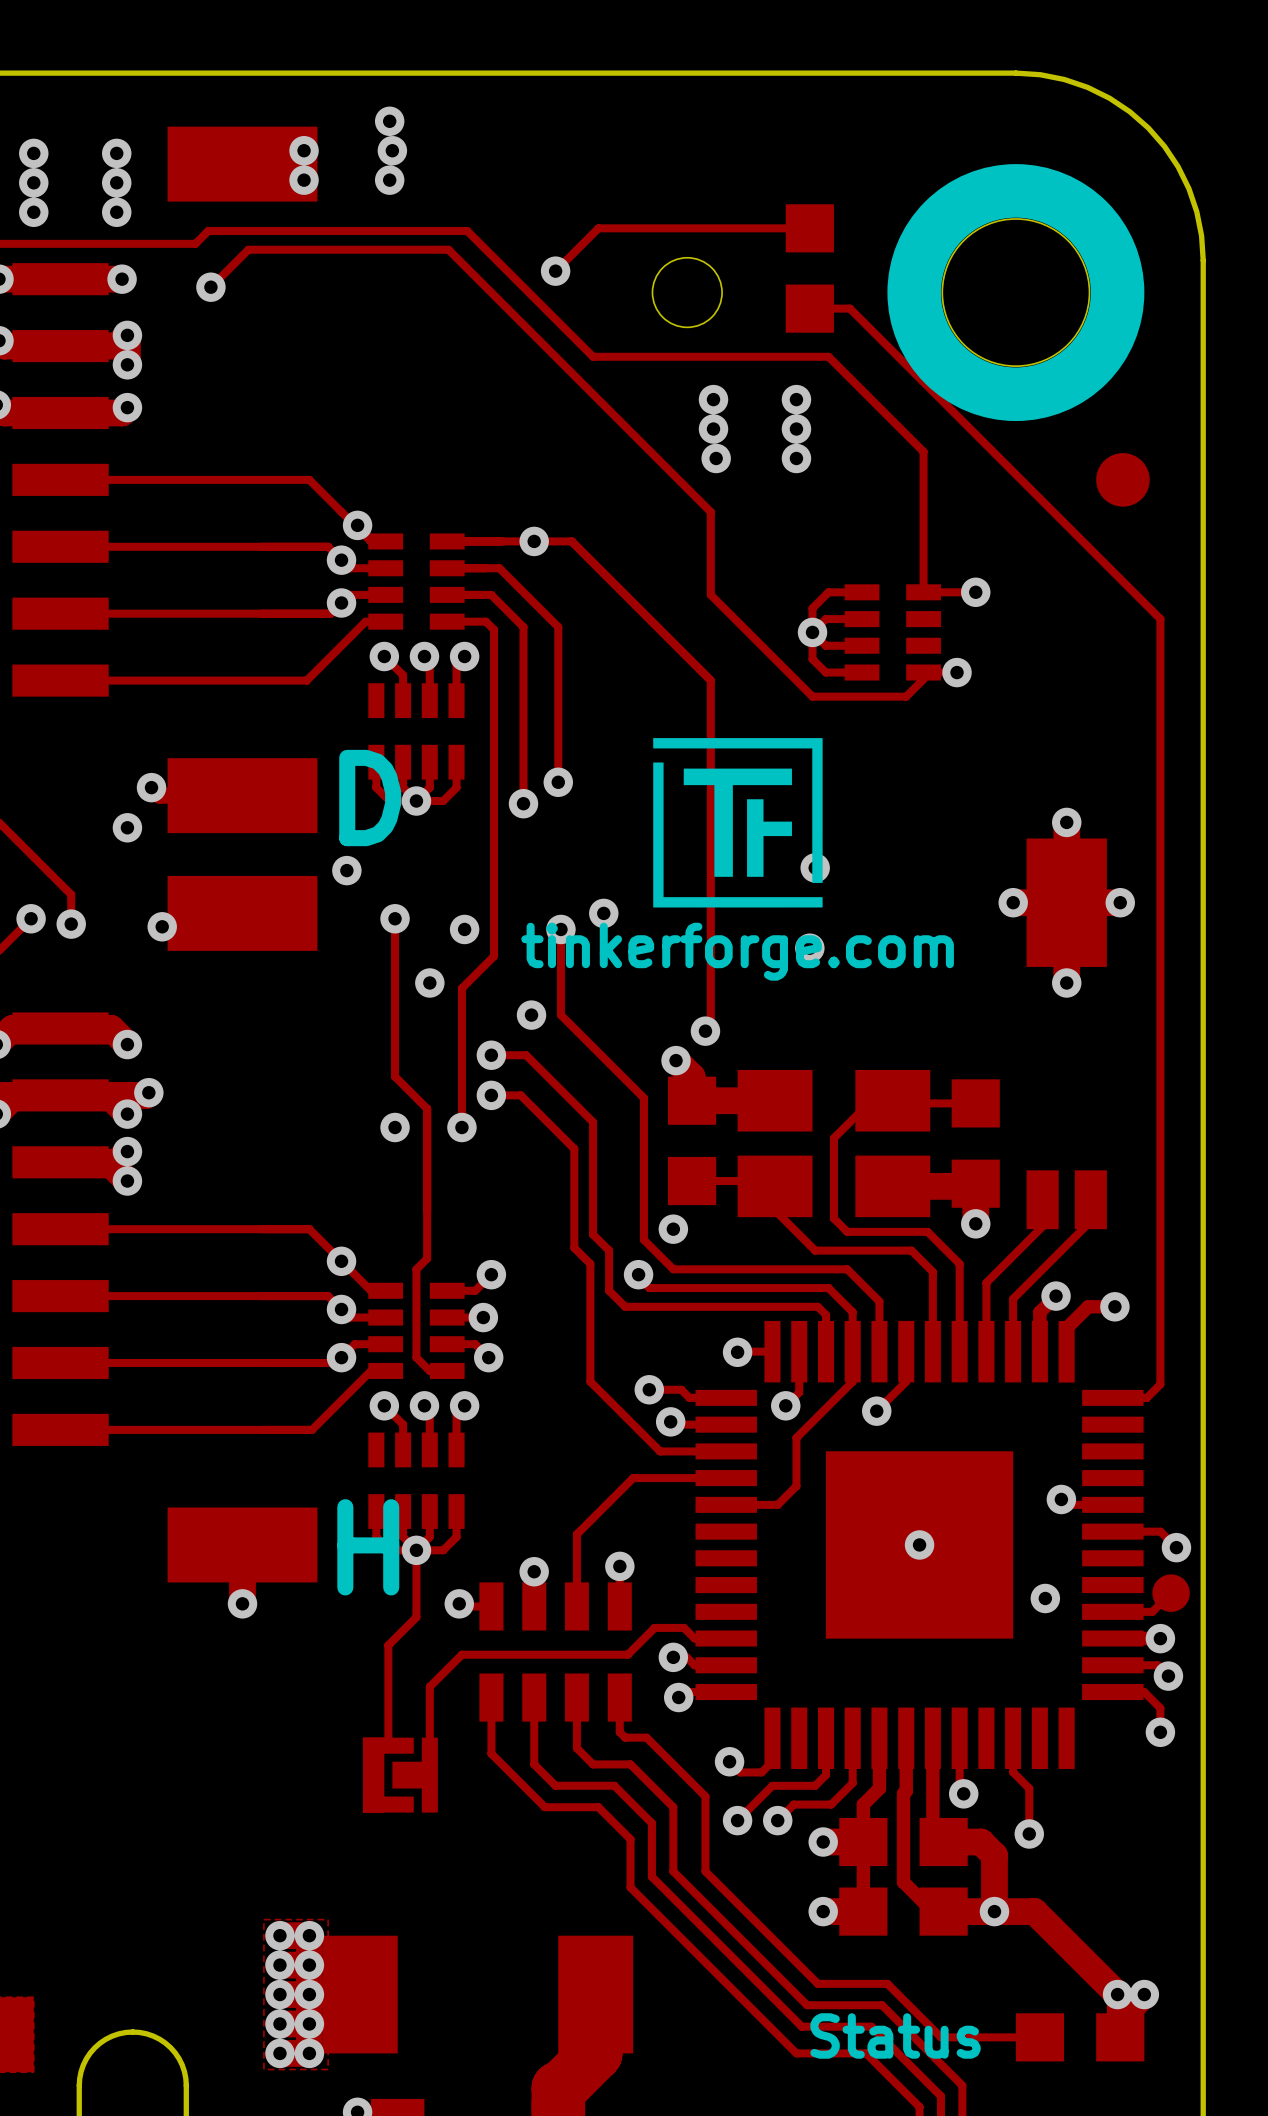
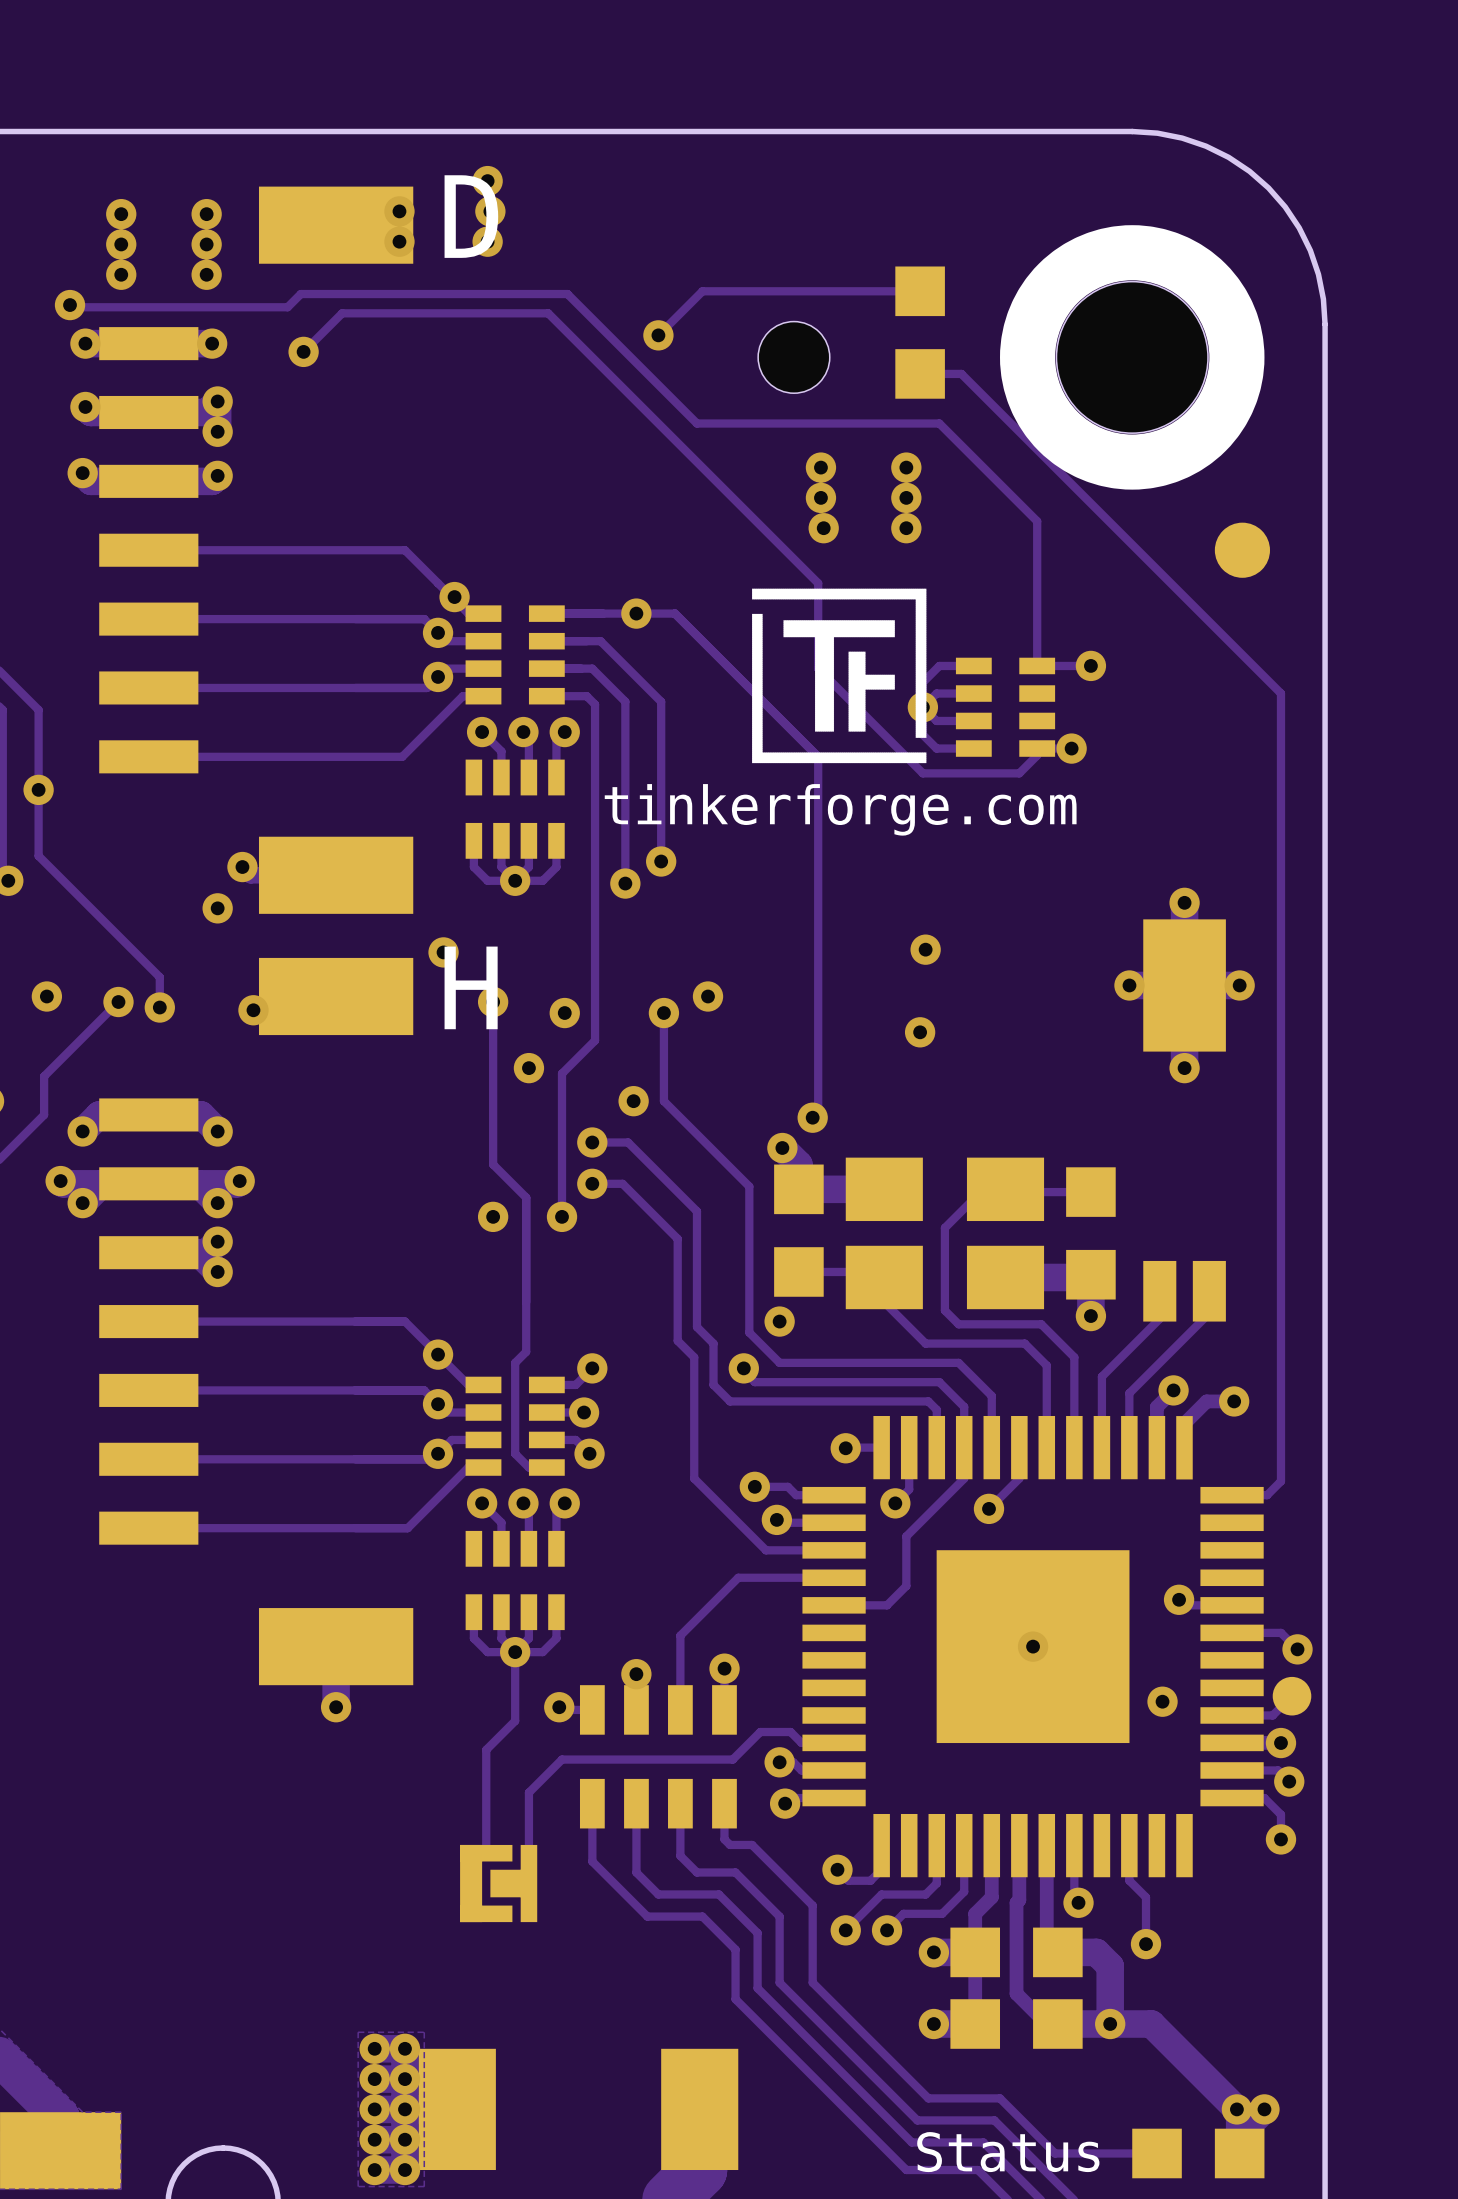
text position: D (370, 798) -> D (471, 216)
drawing position: (737, 822) -> (839, 675)
text position: tinkerforge.com (737, 951) -> tinkerforge.com (840, 809)
text position: H (368, 1547) -> H (471, 987)

